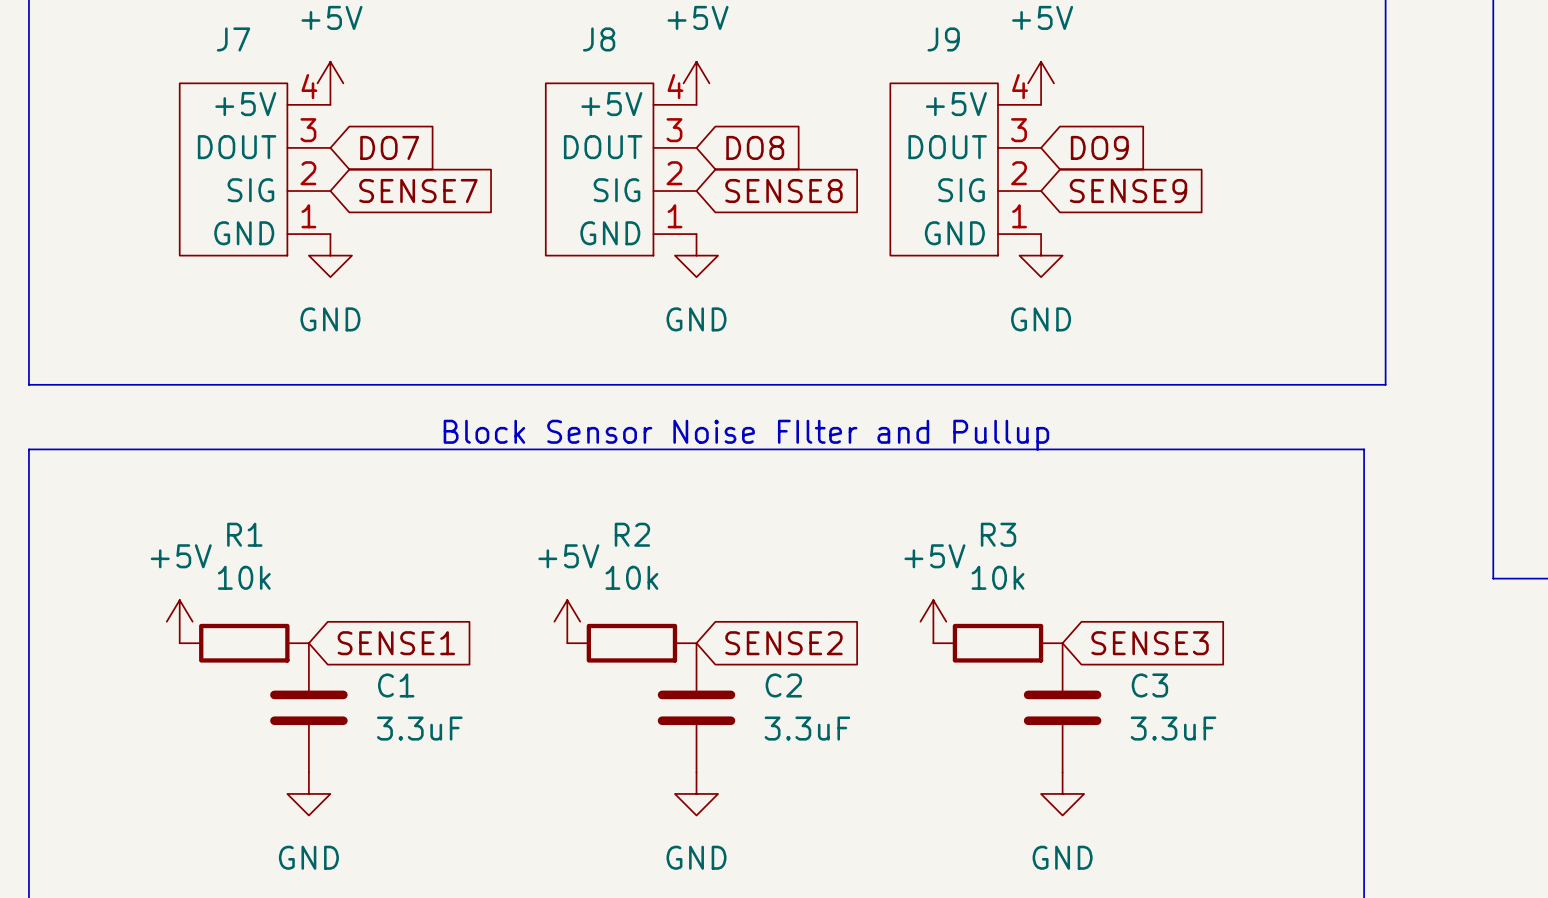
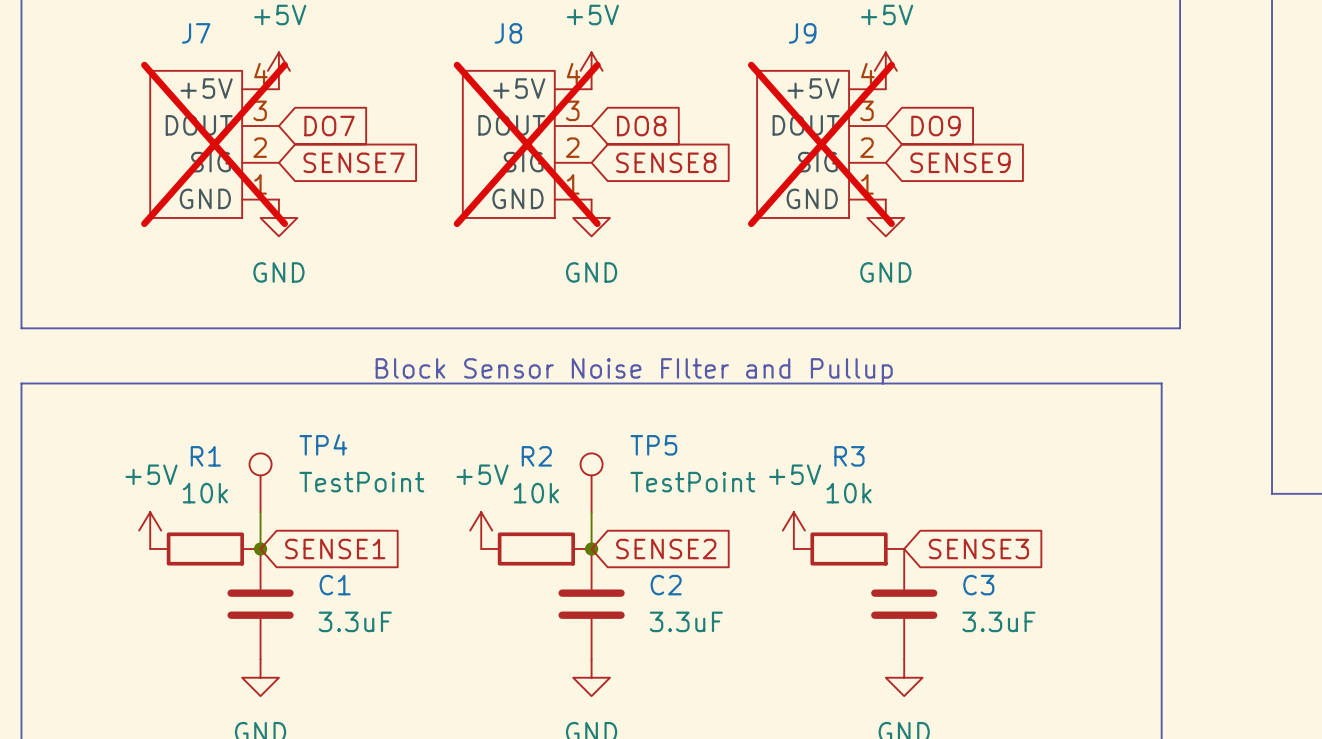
J7 do-not-place cross: none -> (214, 144)
J8 do-not-place cross: none -> (527, 144)
J9 do-not-place cross: none -> (821, 144)
TP4: none -> TestPoint (260, 482)
TP5: none -> TestPoint (591, 482)
wire: none -> (260, 512) (260, 549)
wire: none -> (591, 512) (591, 549)
junction: none -> (260, 549)
junction: none -> (591, 549)

